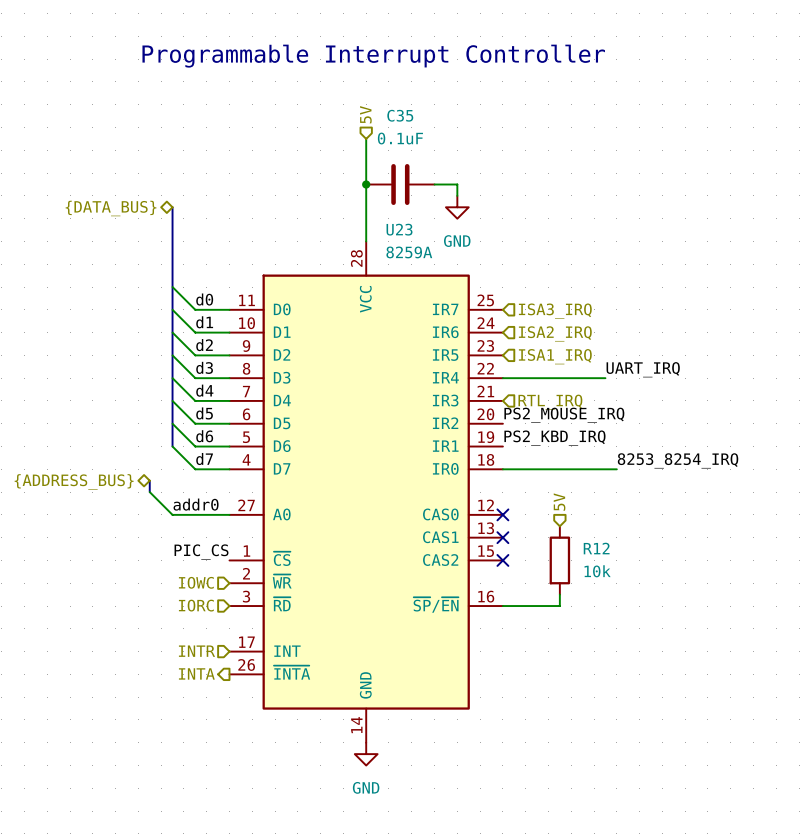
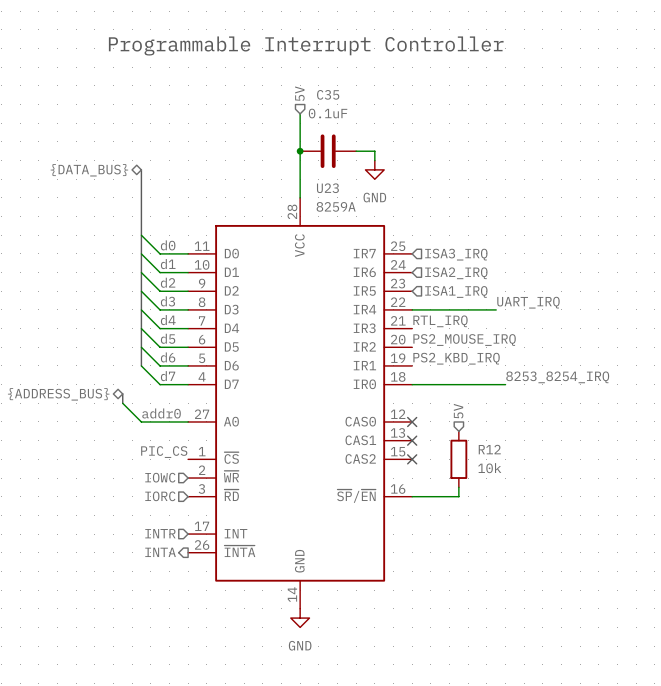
label: none -> RTL_IRQ (440, 321)
hierarchical label: RTL_IRQ (550, 402) -> none

